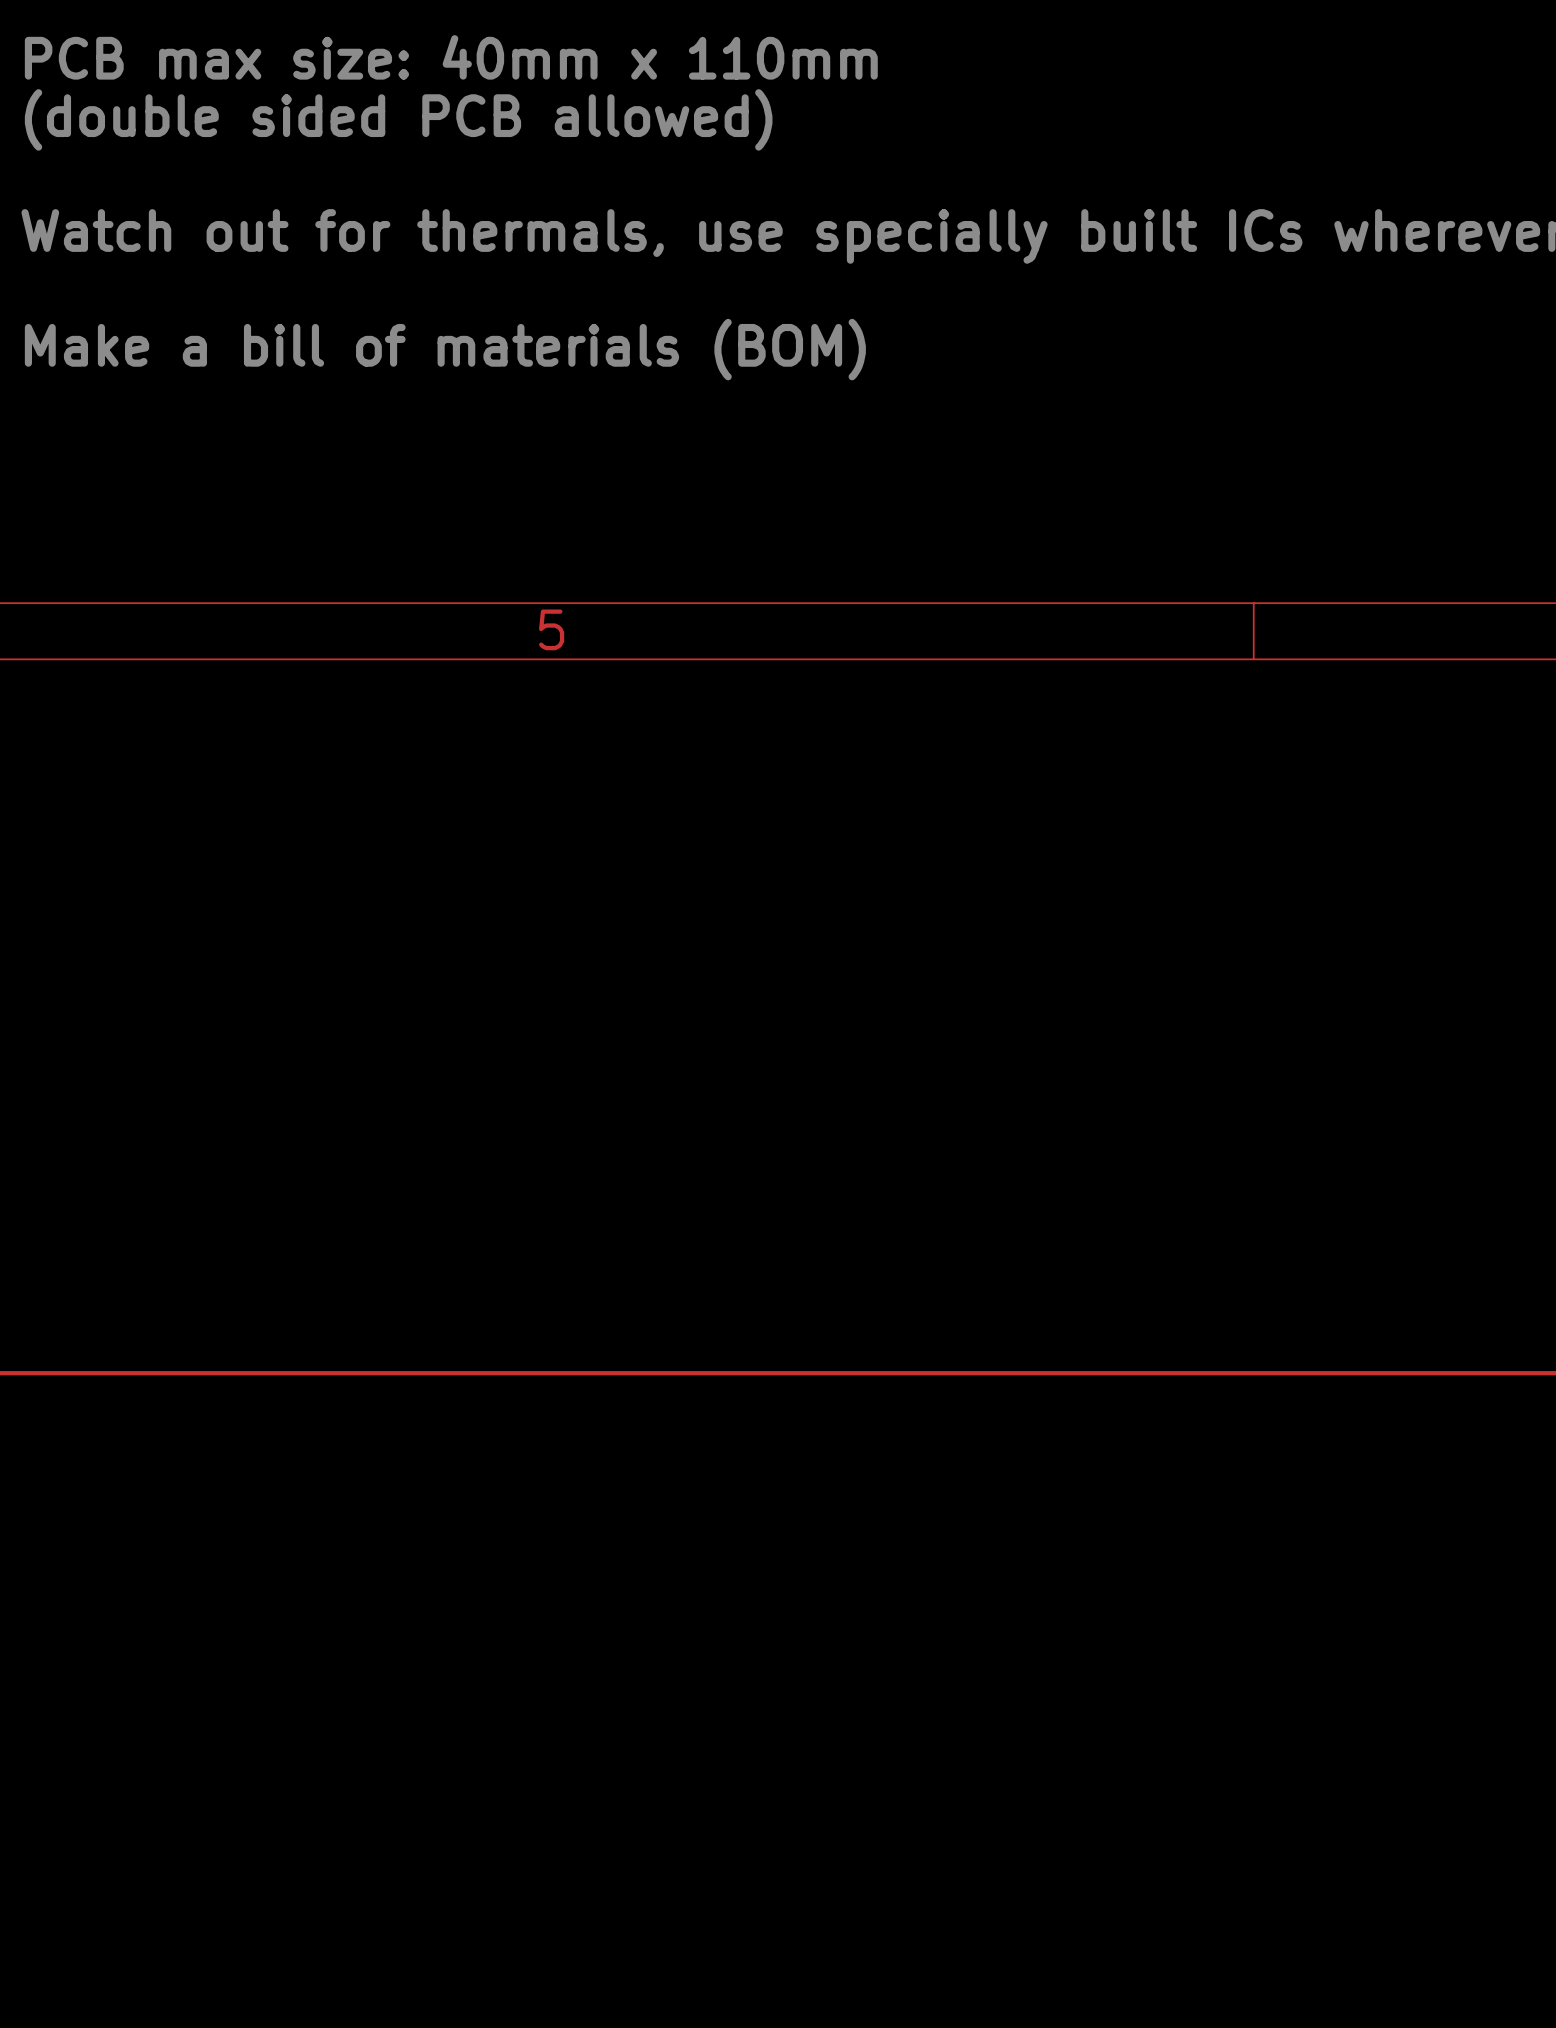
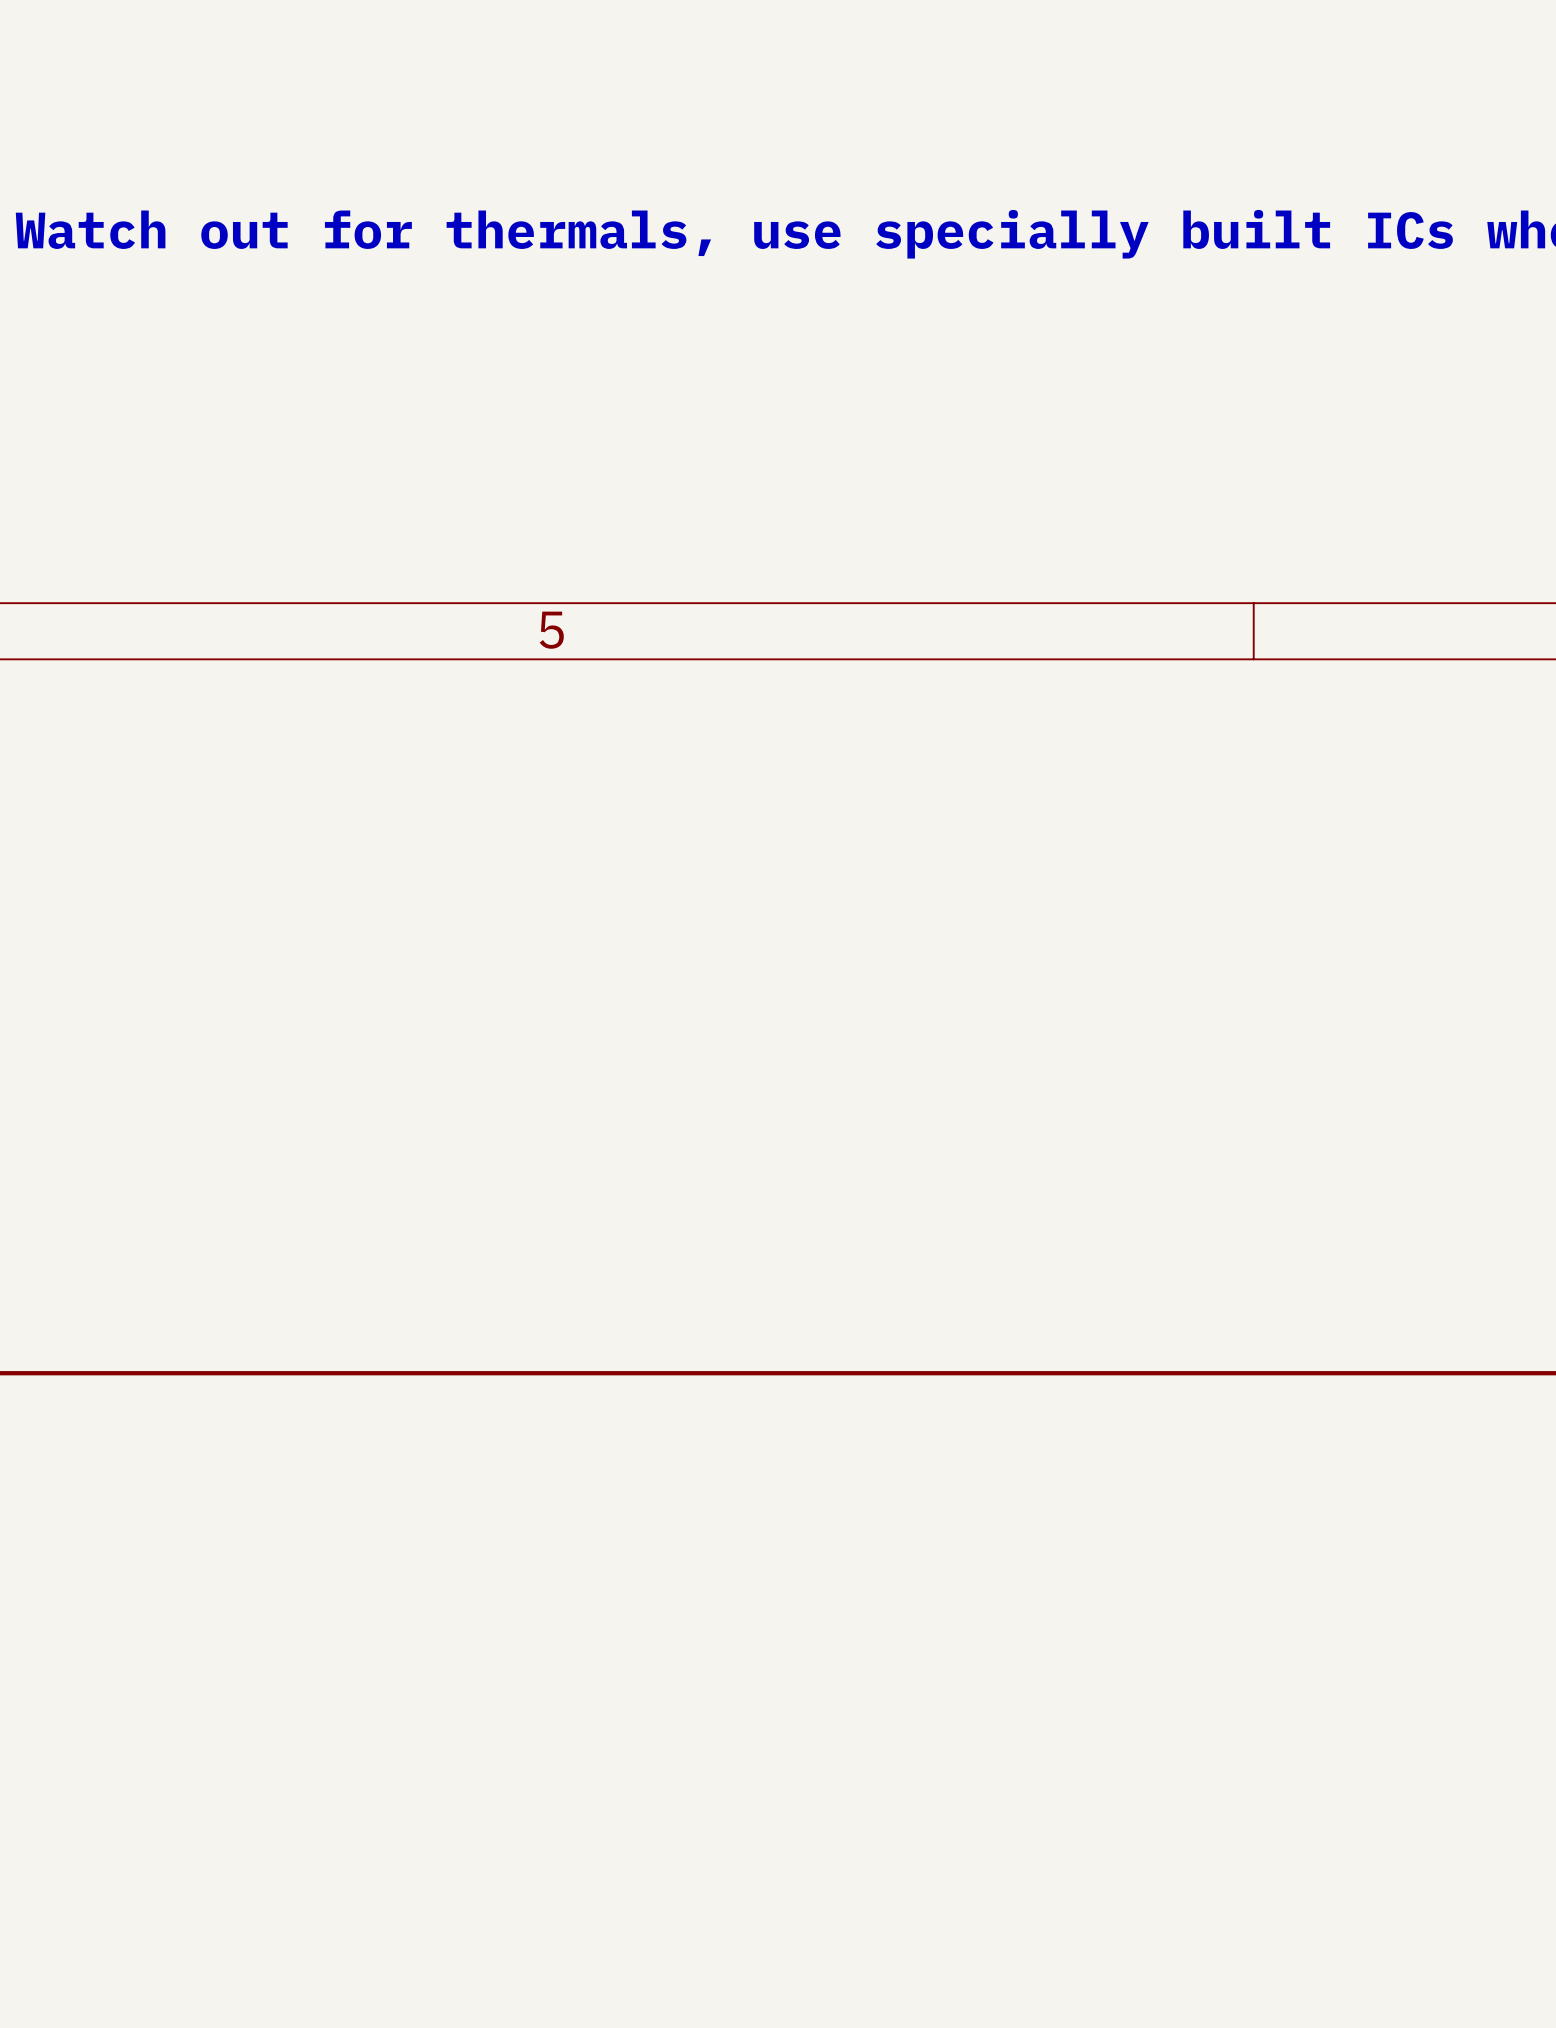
text: PCB max size: 40mm x 110mm (451, 57) -> none
text: (double sided PCB allowed) (398, 119) -> none
text: Make a bill of materials (BOM) (445, 349) -> none

